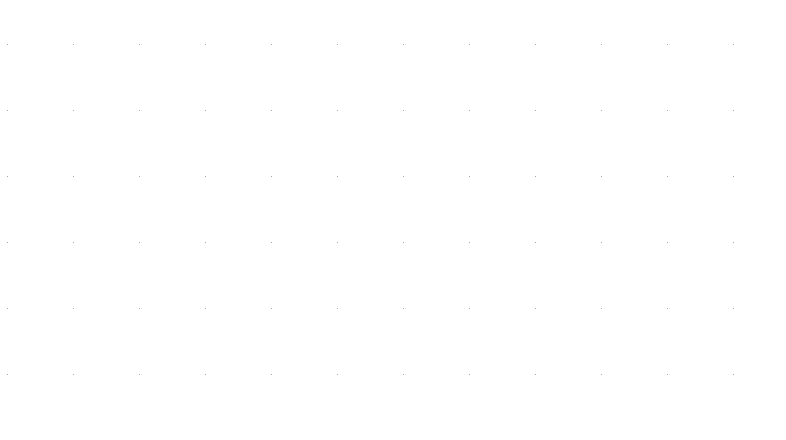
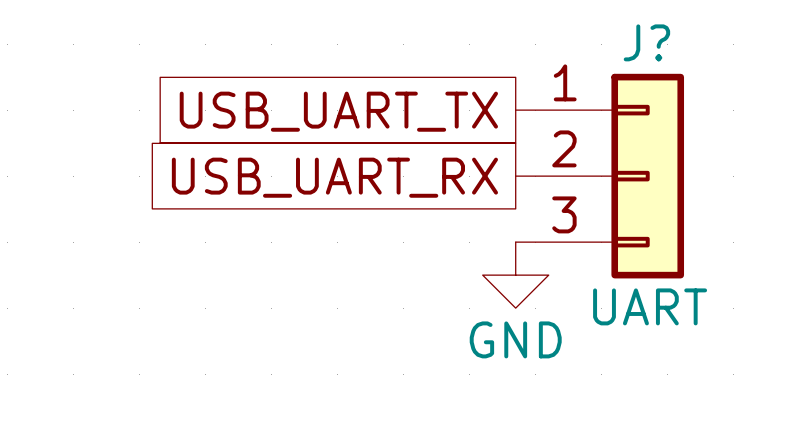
global label: none -> USB_UART_TX (338, 111)
J?: none -> UART (599, 176)
global label: none -> USB_UART_RX (334, 177)
power symbol: none -> GND (515, 275)

